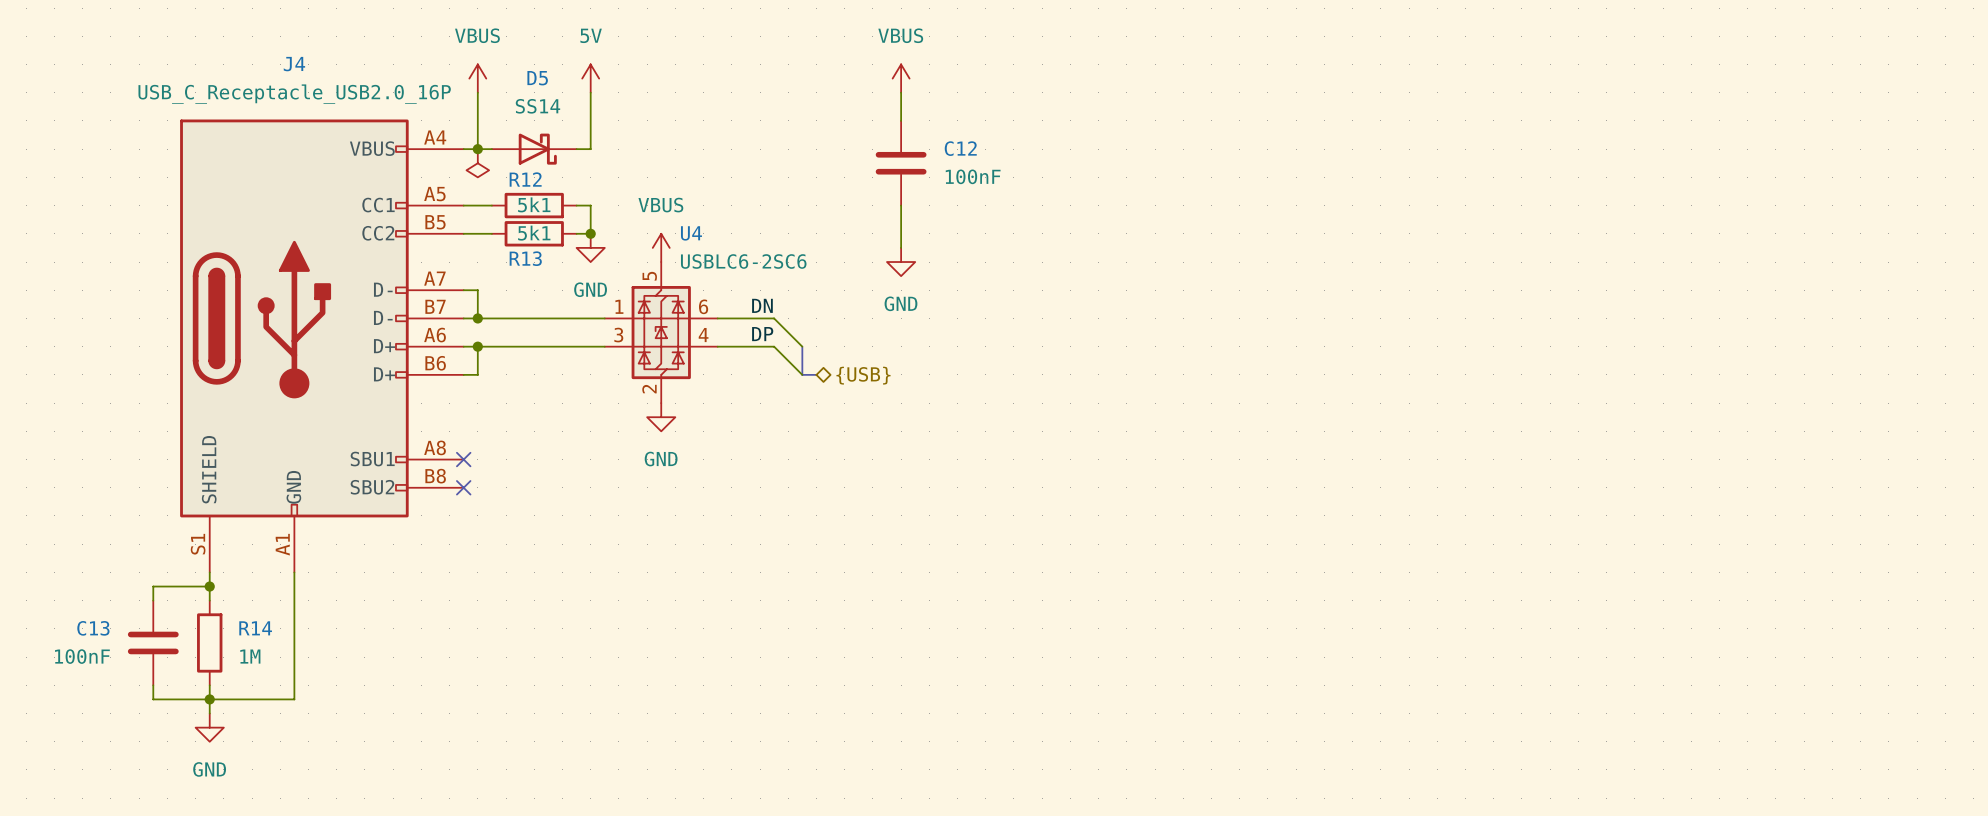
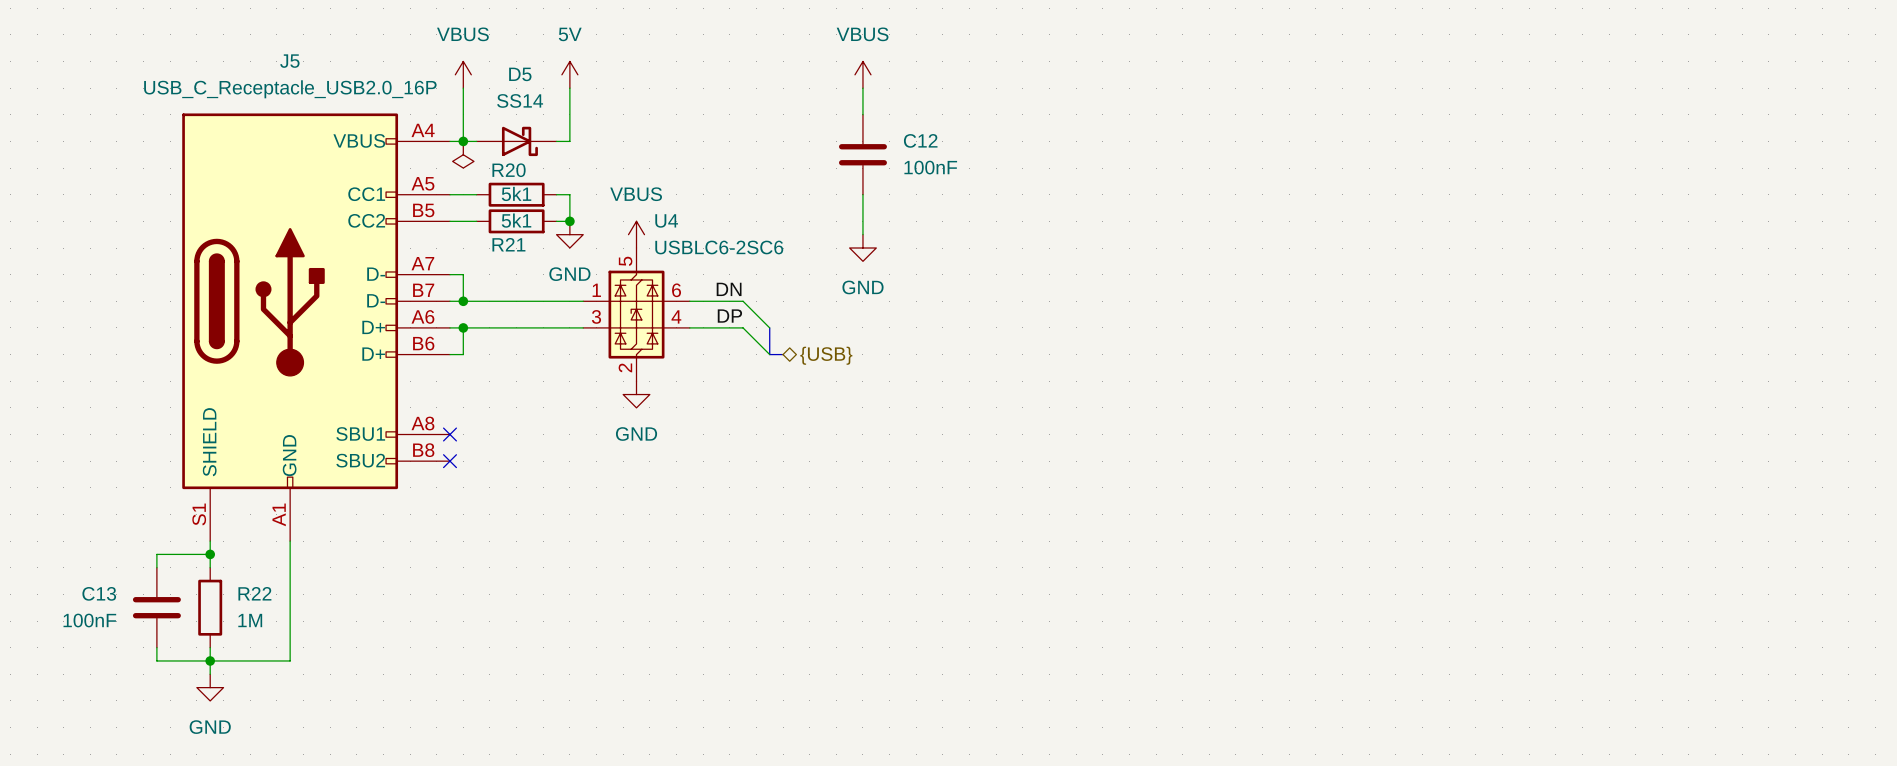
J4 name: J4 (294, 64) -> J5 (289, 61)
R12 name: R12 (525, 179) -> R20 (509, 170)
R13 name: R13 (525, 258) -> R21 (508, 244)
R14 name: R14 (255, 628) -> R22 (254, 593)

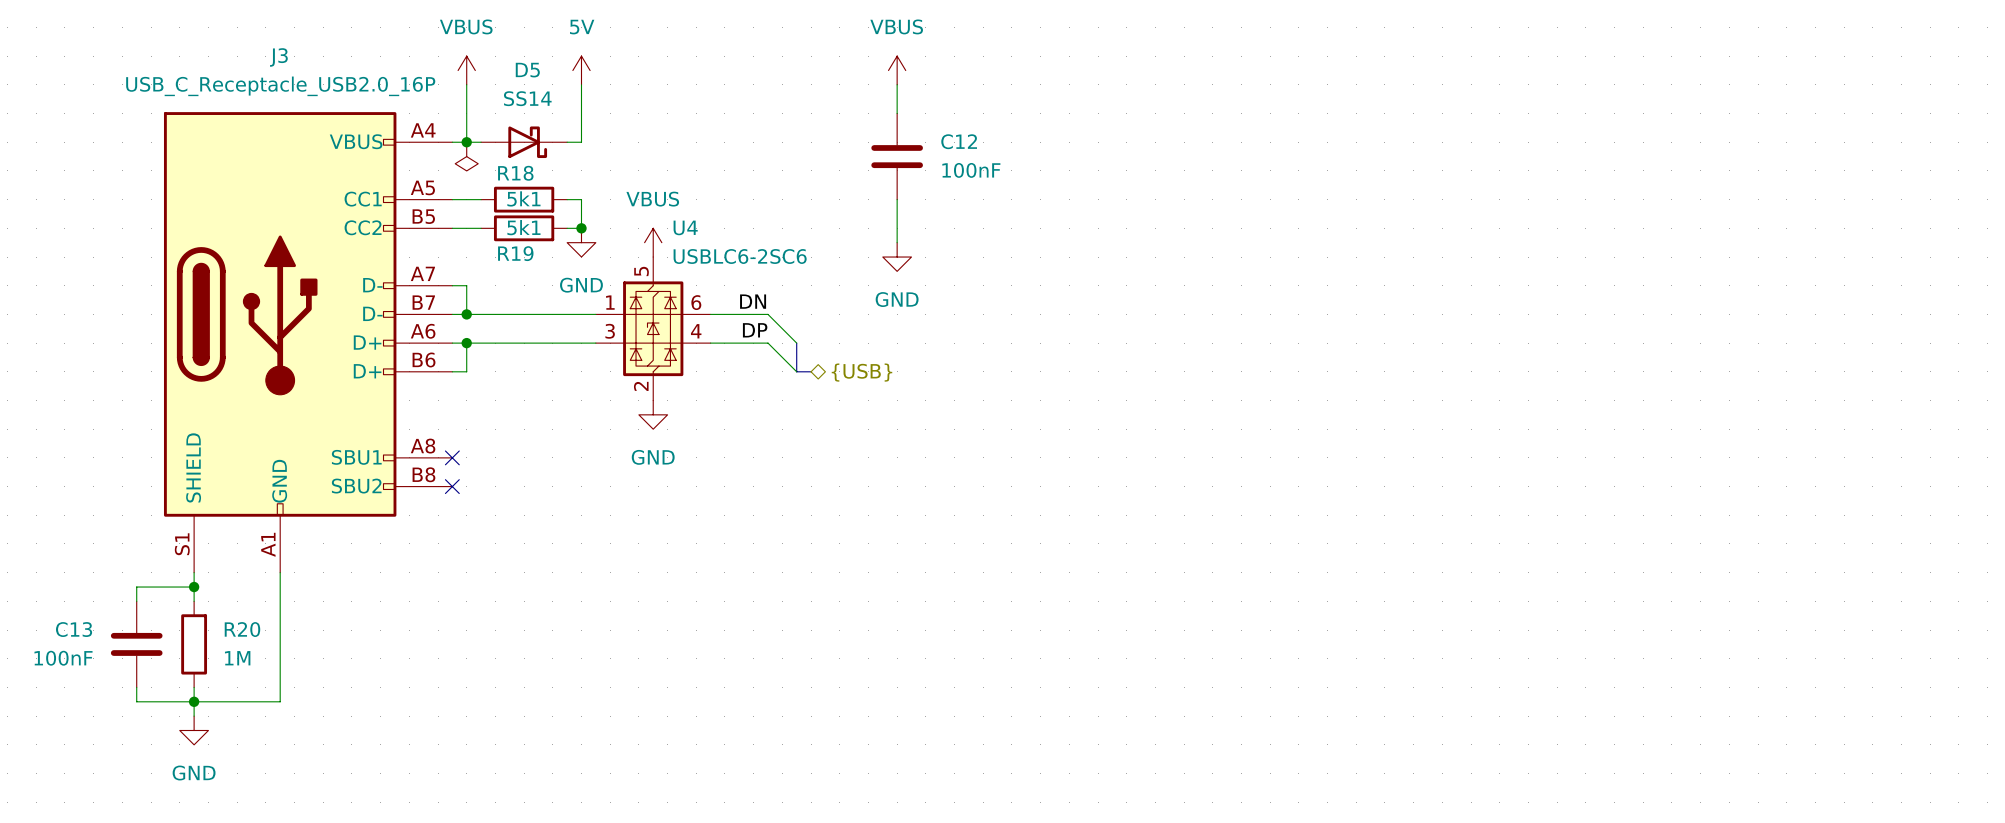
J5 name: J5 (289, 61) -> J3 (278, 57)
R20 name: R20 (509, 170) -> R18 (515, 173)
R21 name: R21 (508, 244) -> R19 (515, 253)
R22 name: R22 (254, 593) -> R20 (242, 629)

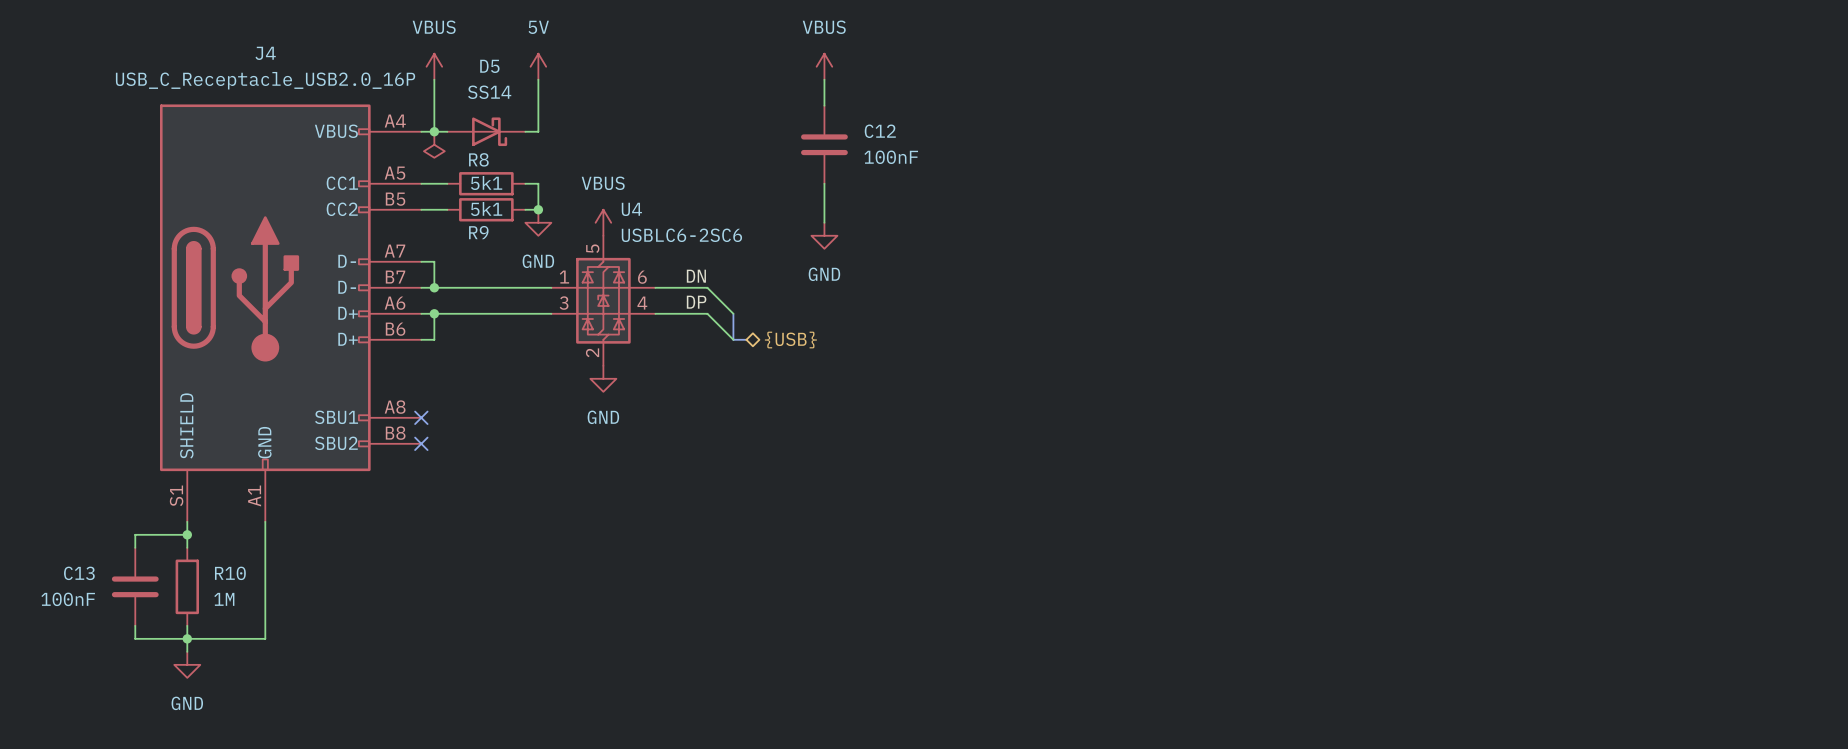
J3 name: J3 (278, 57) -> J4 (265, 53)
R18 name: R18 (515, 173) -> R8 (478, 159)
R19 name: R19 (515, 253) -> R9 (478, 232)
R20 name: R20 (242, 629) -> R10 (230, 573)

